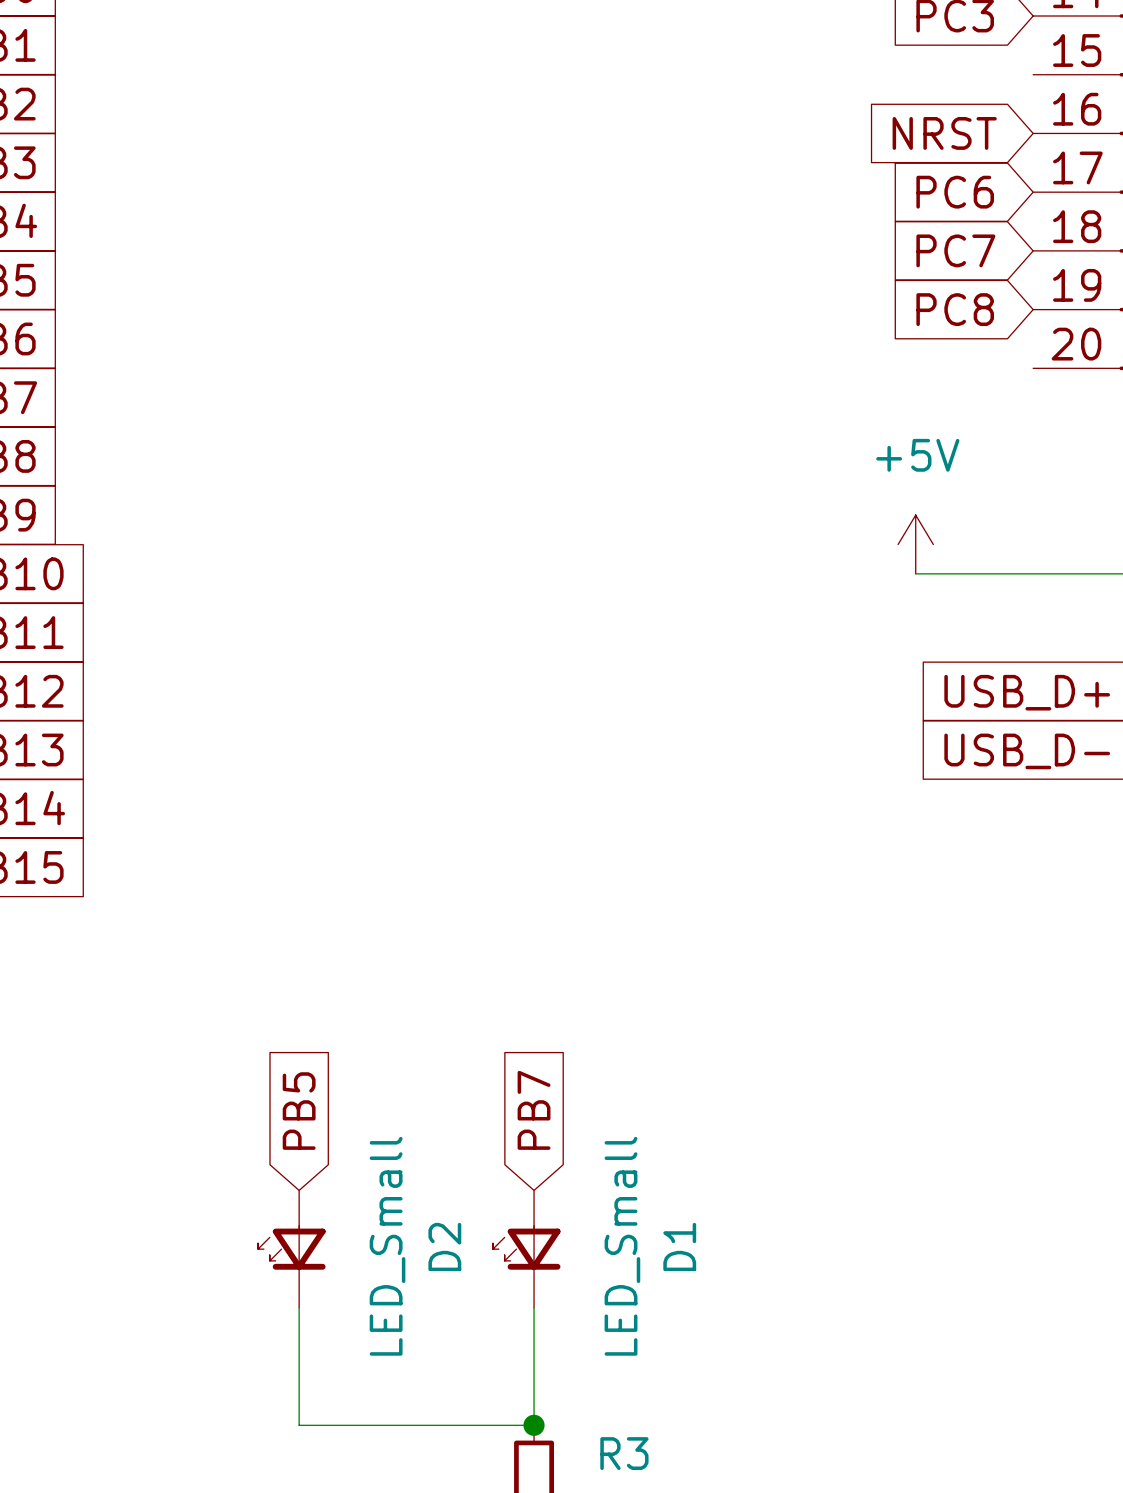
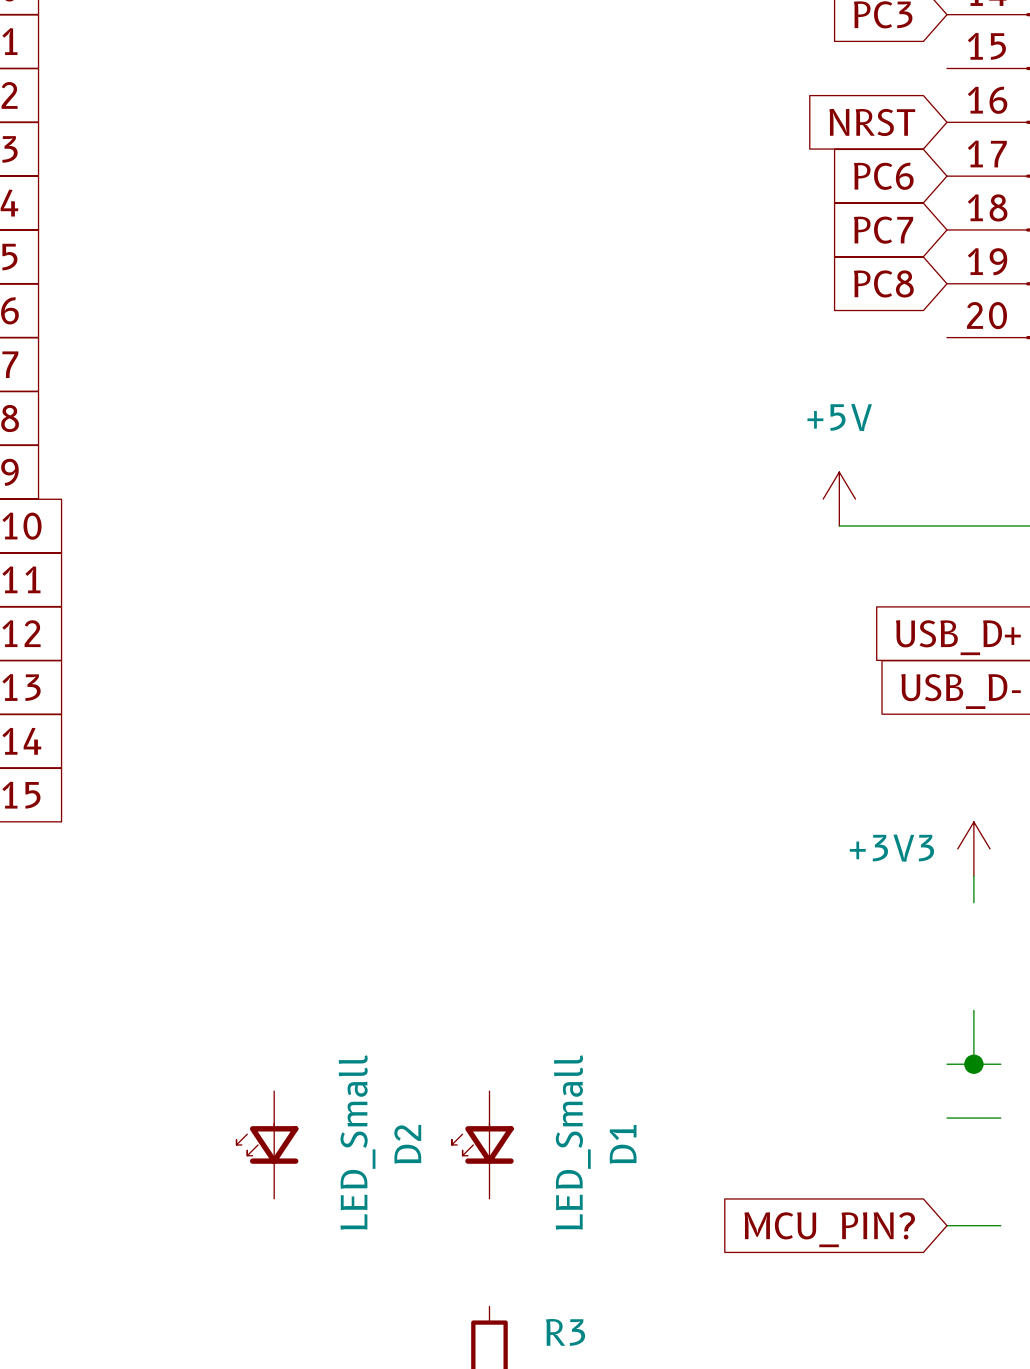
power symbol: none -> +3V3 (973, 848)
wire: none -> (973, 875) (973, 902)
wire: none -> (973, 1010) (973, 1064)
global label: PB7 (534, 1110) -> none
global label: PB5 (299, 1111) -> none
wire: none -> (946, 1064) (1000, 1064)
junction: none -> (973, 1064)
wire: none -> (946, 1118) (1000, 1118)
wire: (299, 1307) (299, 1425) (534, 1425) (534, 1307) -> none
wire: none -> (946, 1225) (1000, 1225)
global label: none -> MCU_PIN? (829, 1229)
junction: (534, 1425) -> none

